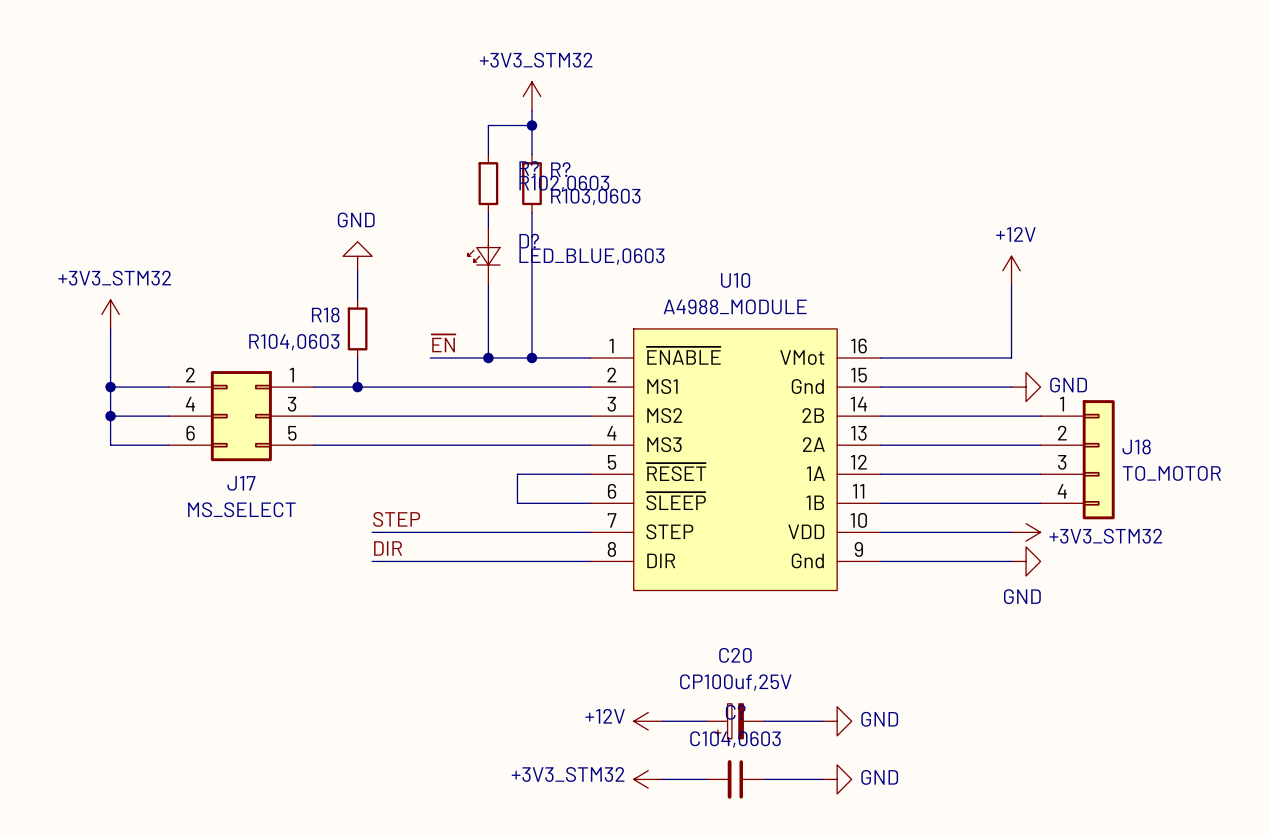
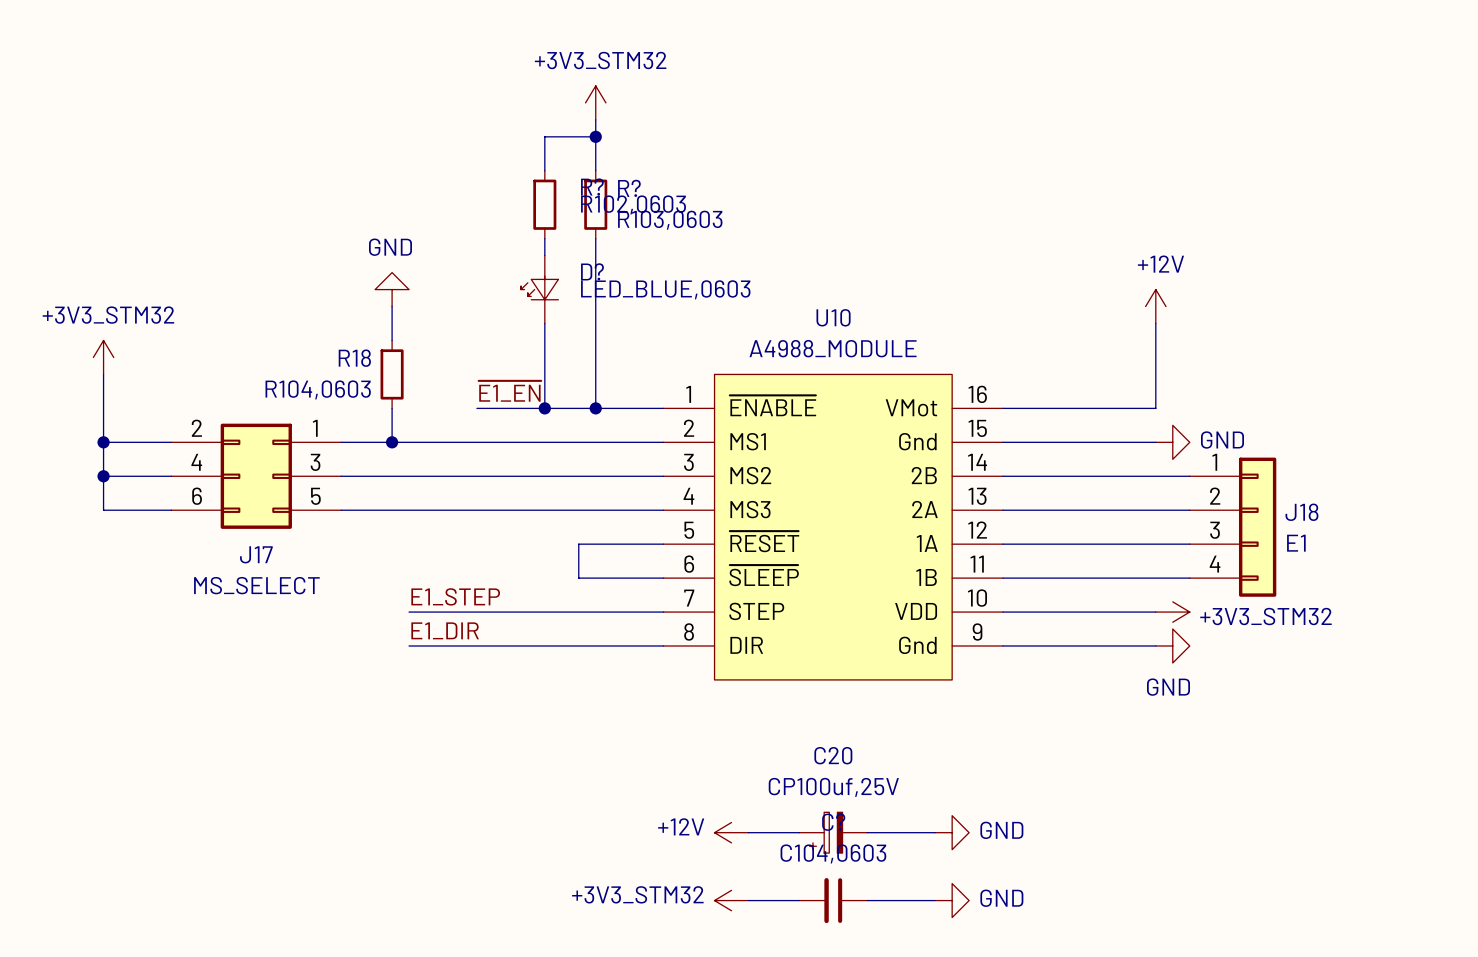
label: ~{EN} (443, 343) -> ~{E1_EN} (509, 391)
J18 value: TO_MOTOR (1171, 473) -> E1 (1296, 543)
label: STEP (396, 519) -> E1_STEP (455, 596)
label: DIR (388, 548) -> E1_DIR (445, 630)

